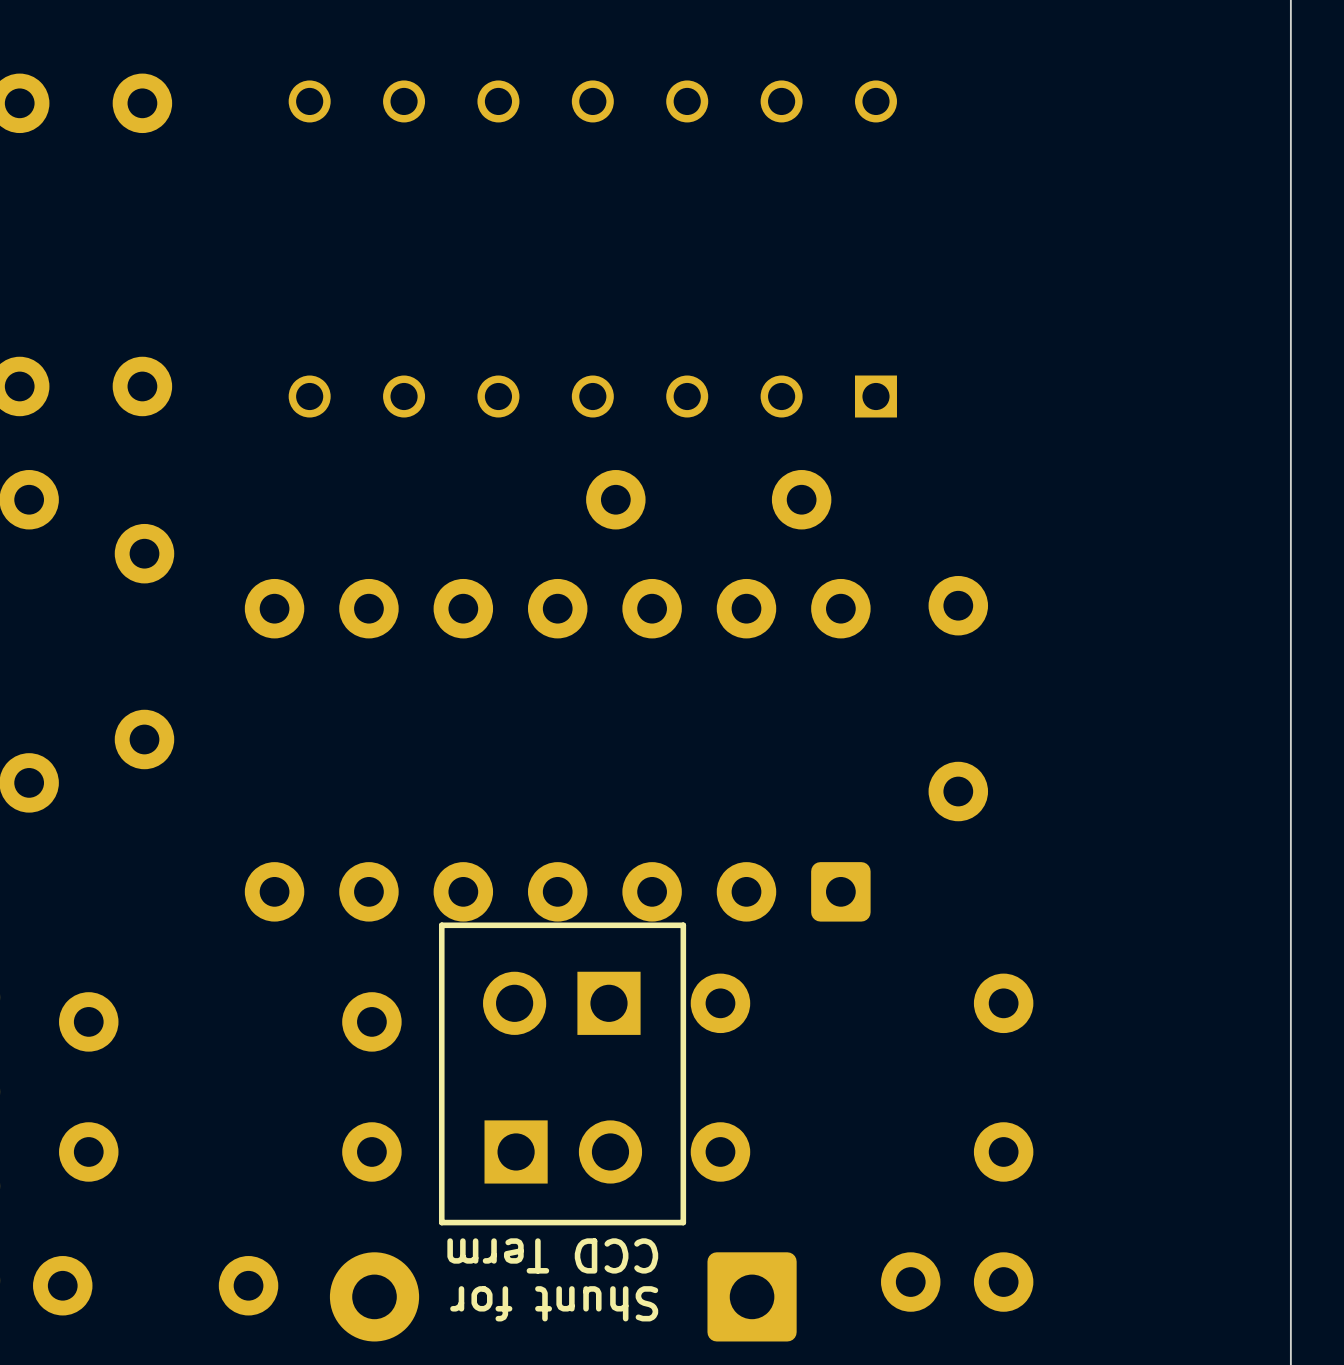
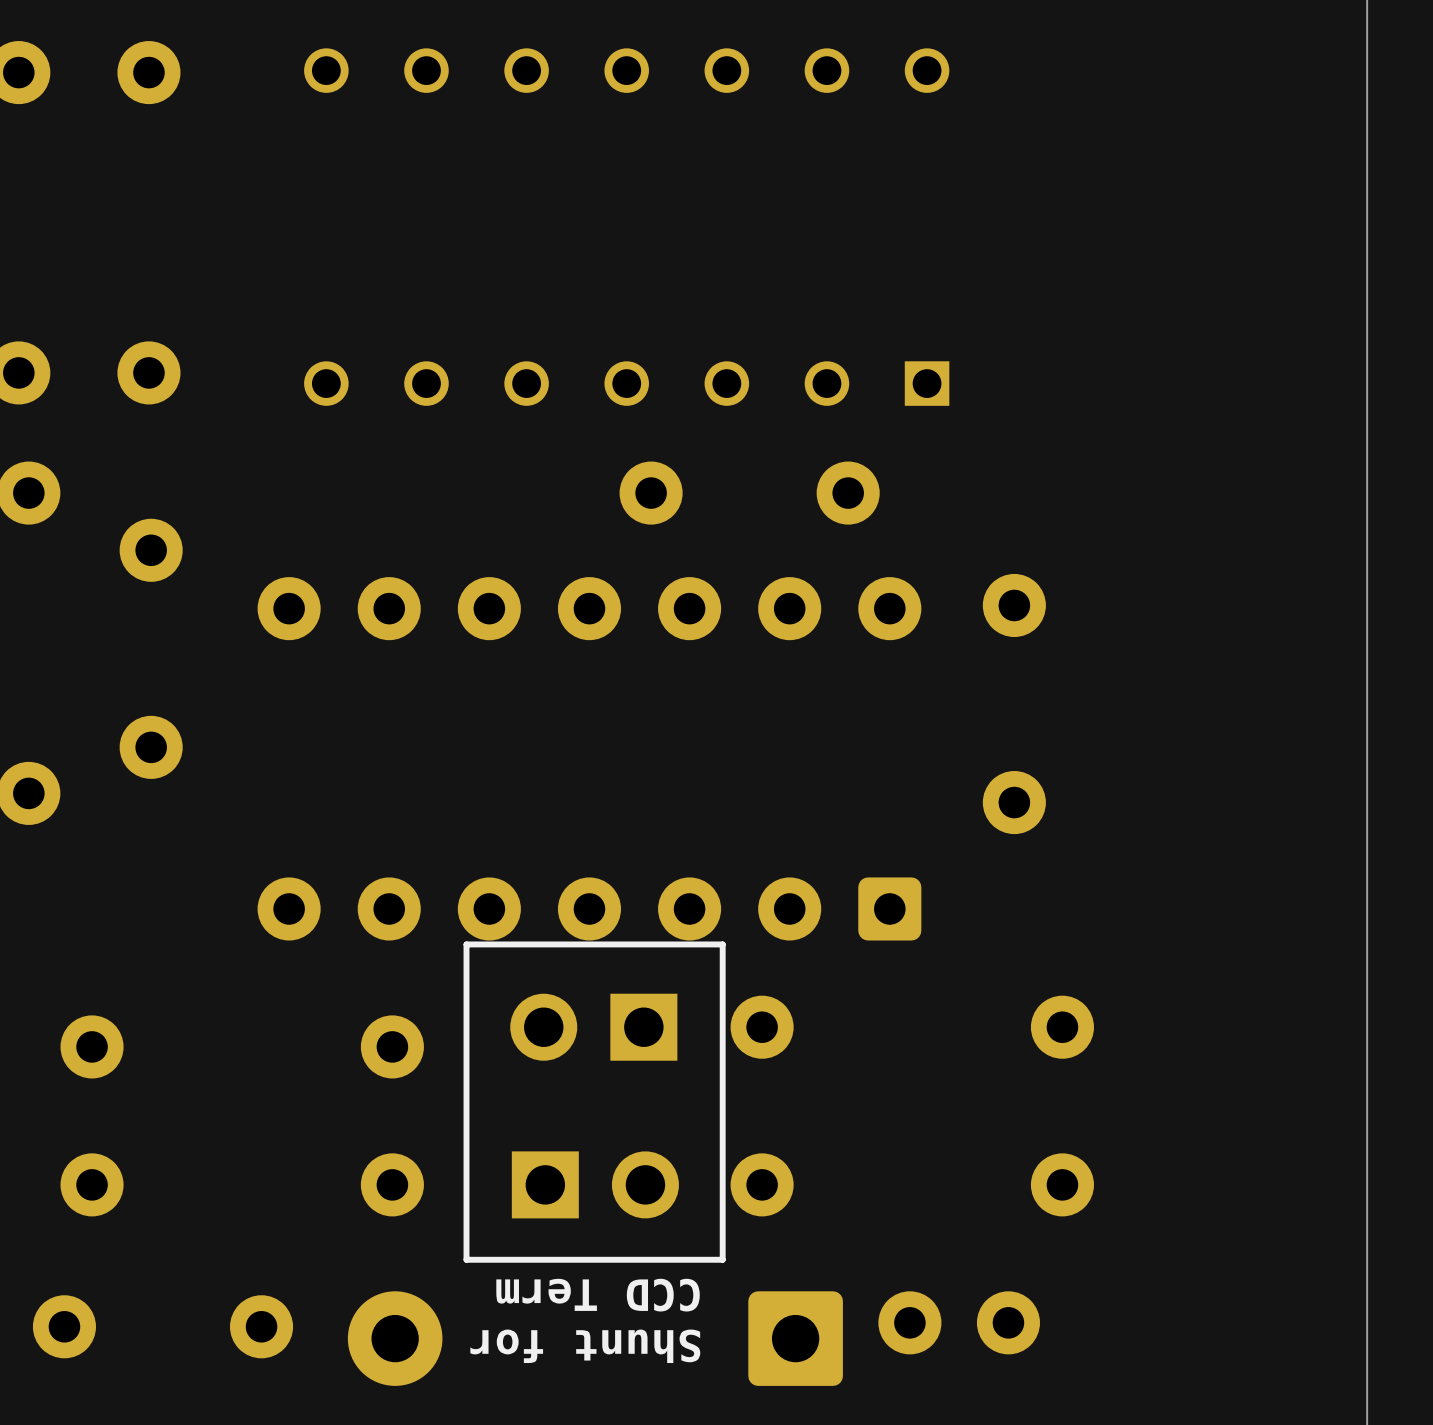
part position: (957, 1282) -> (959, 1322)

